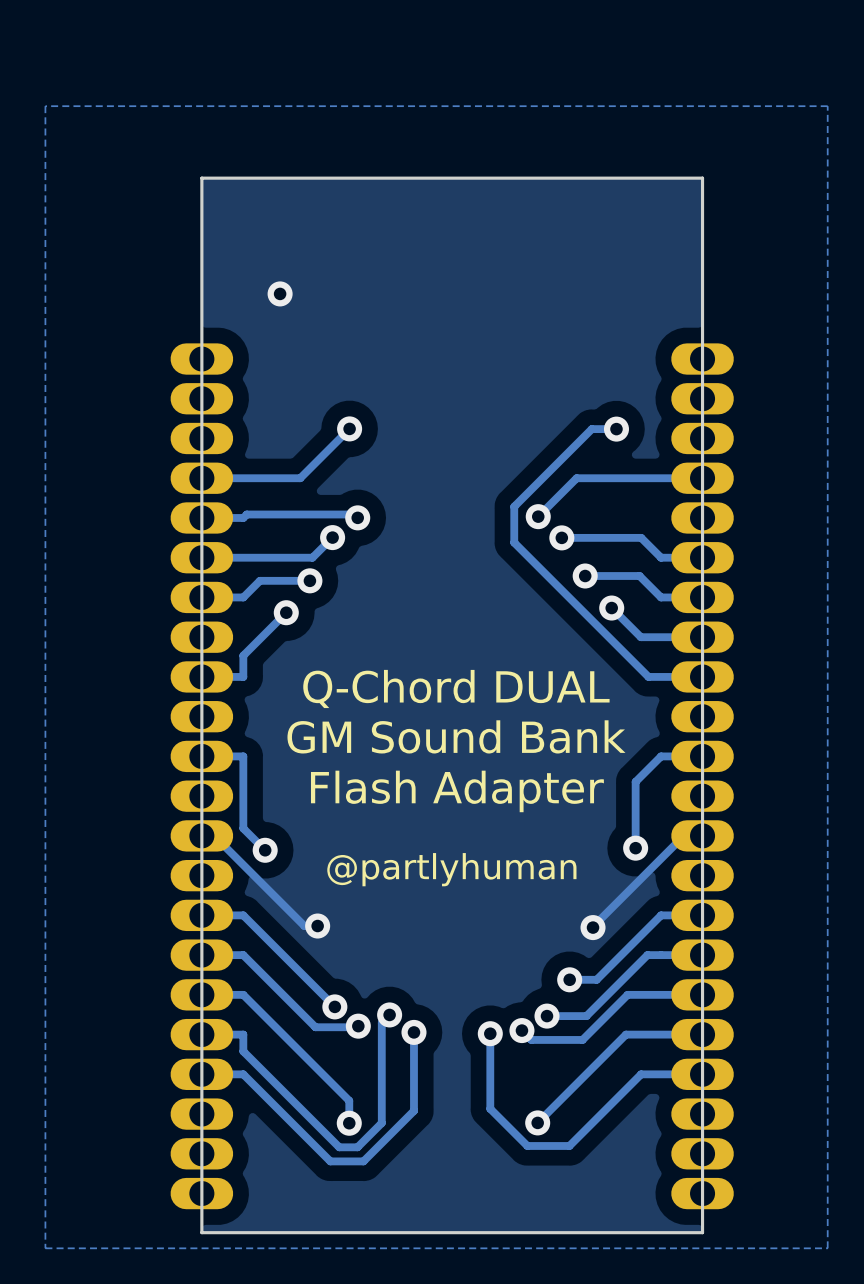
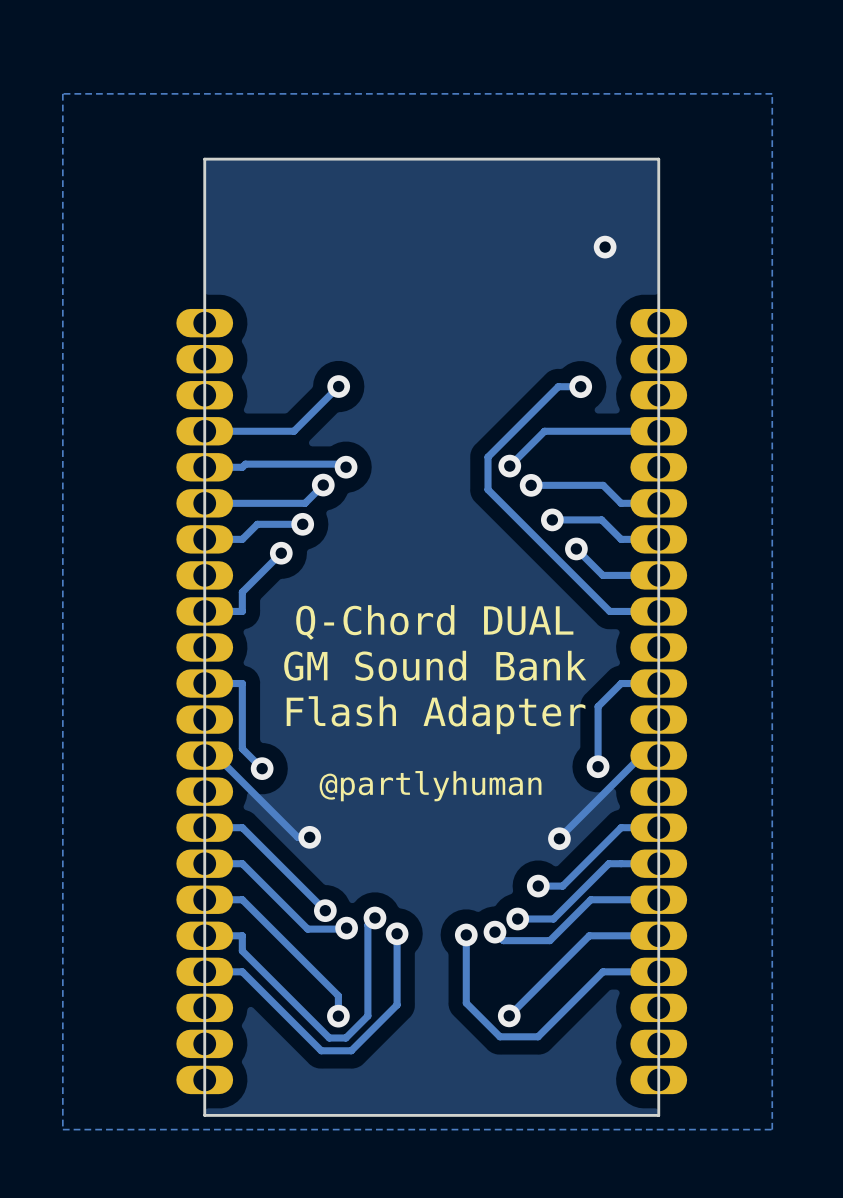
via: none -> (605, 247)
via: (280, 293) -> none

